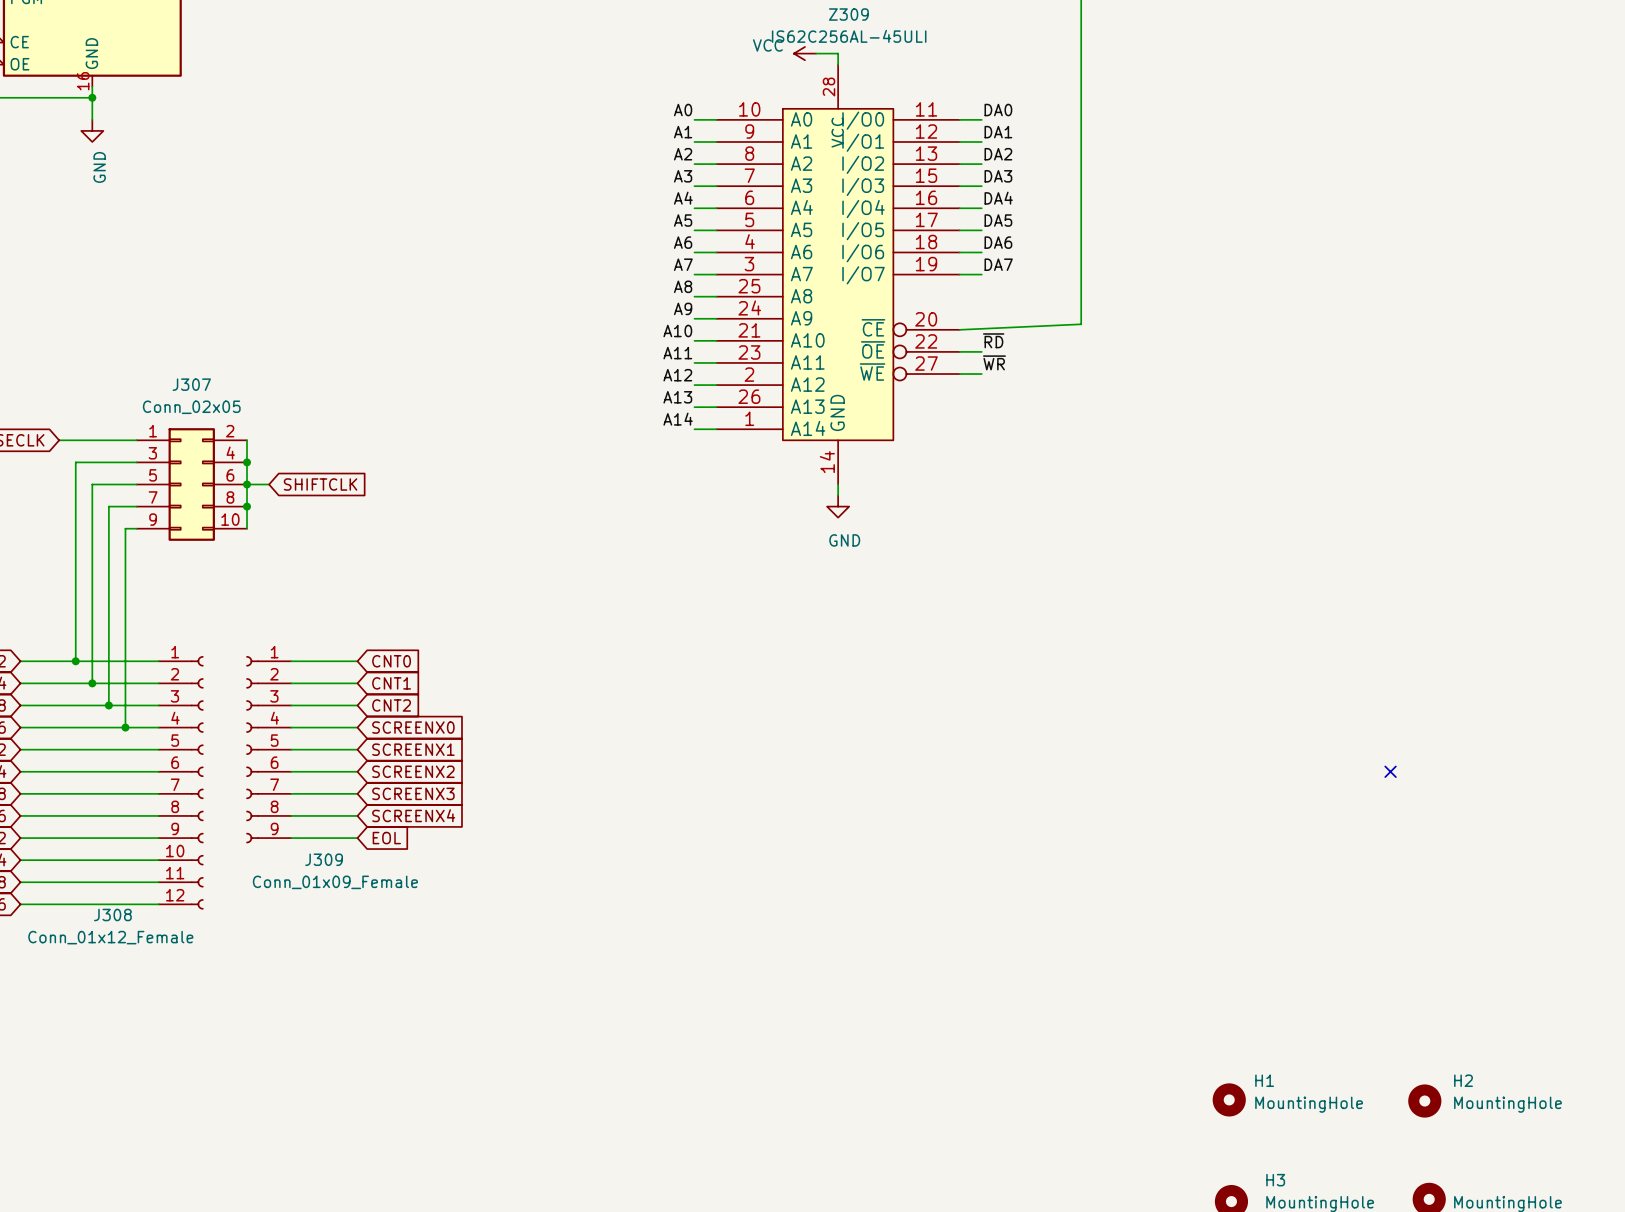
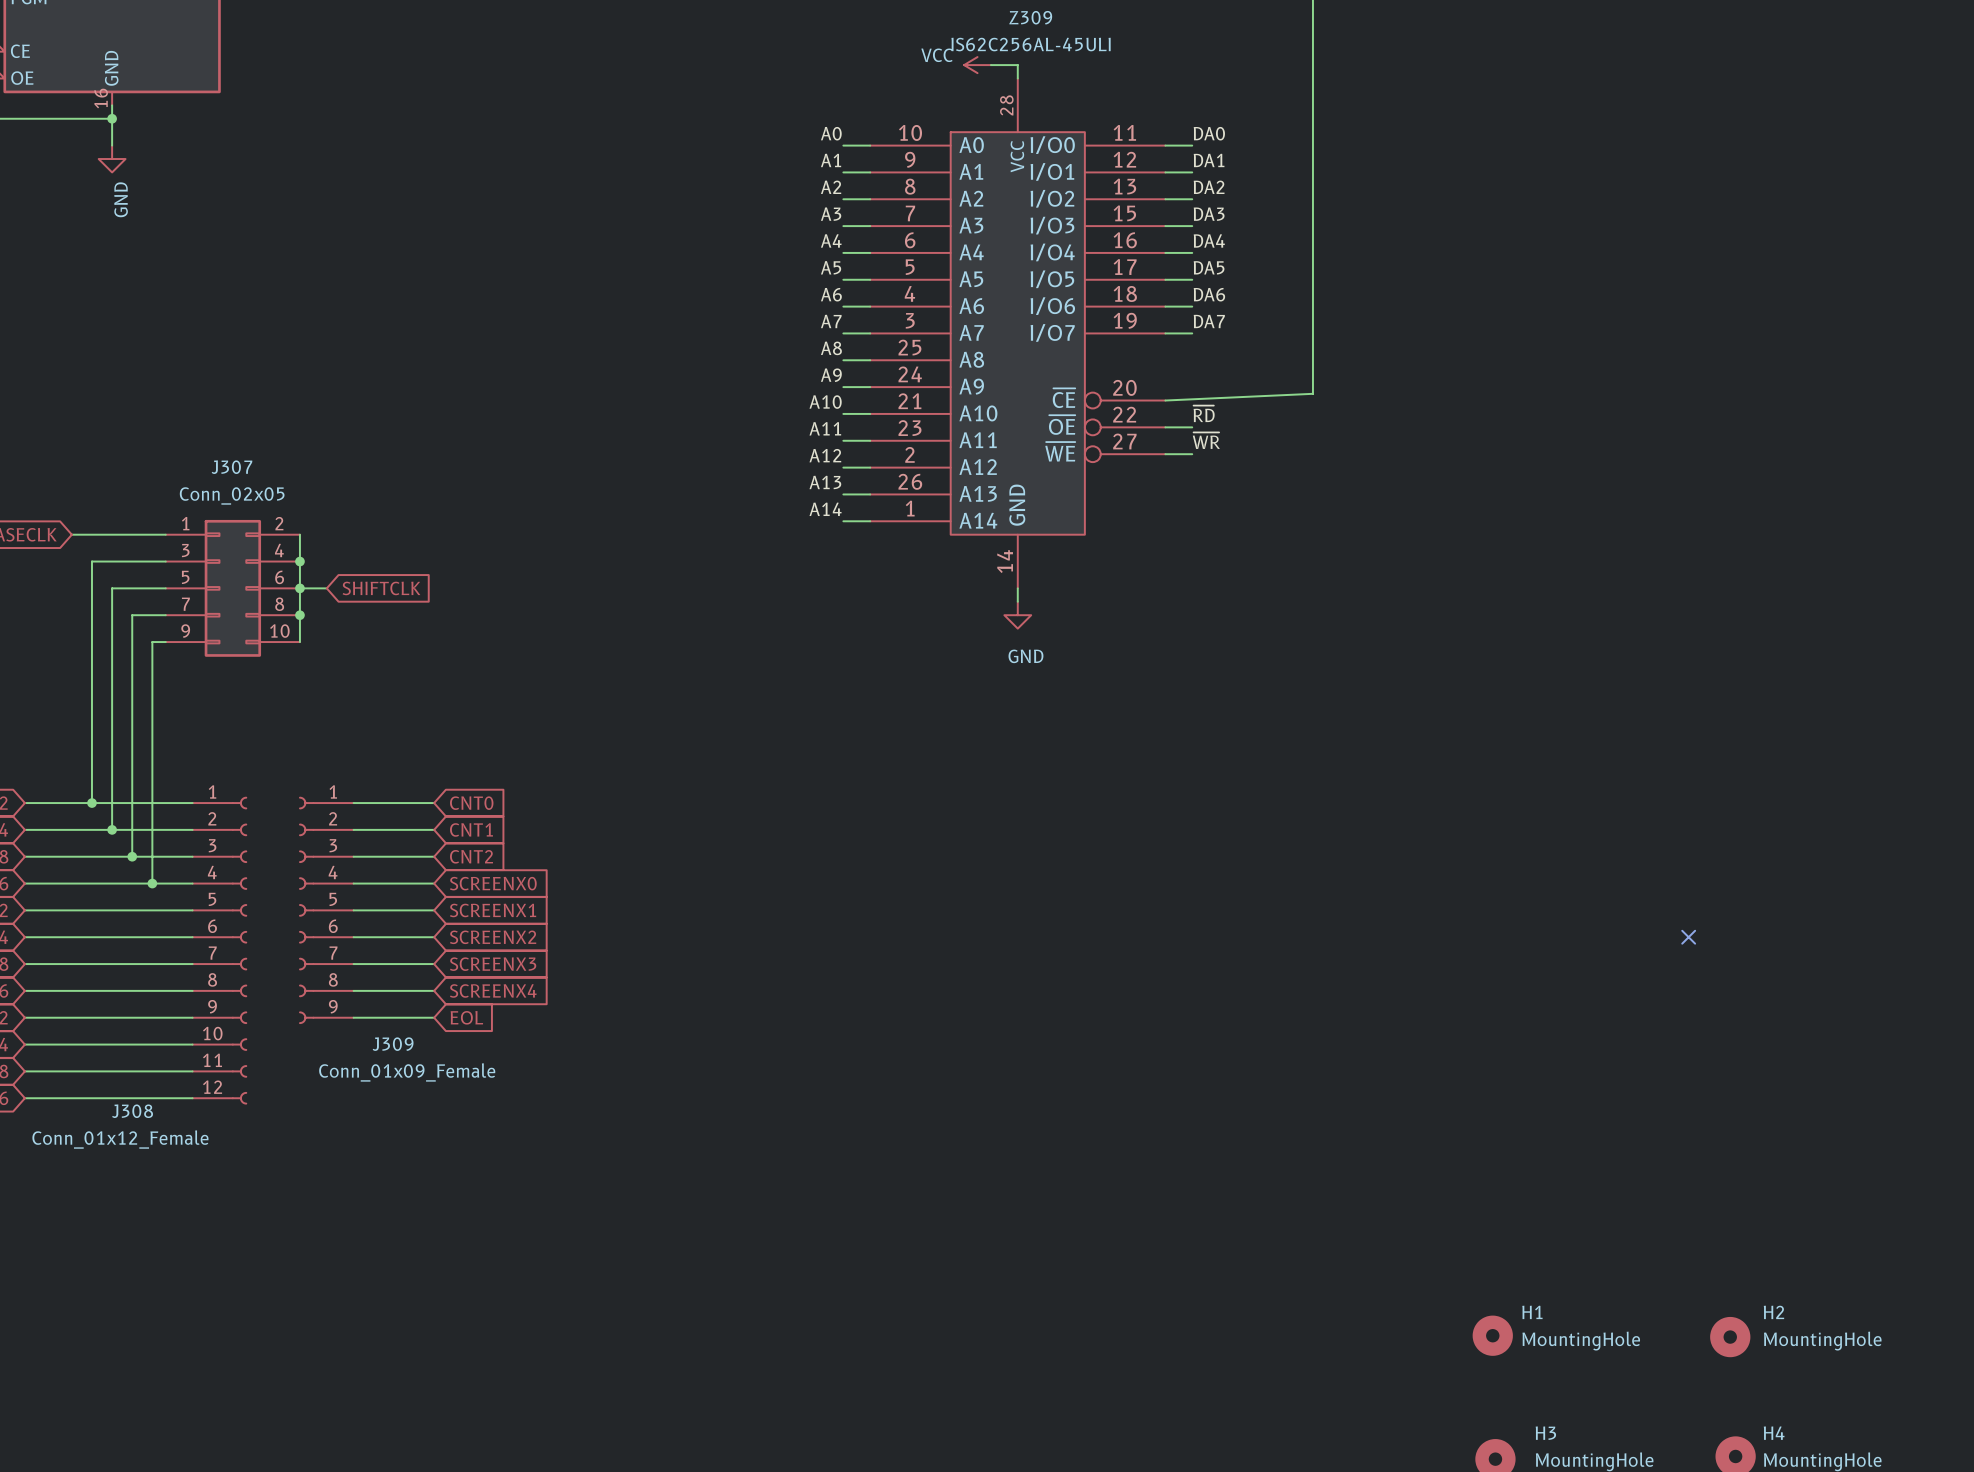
H4 name: none -> H4 (1774, 1433)

